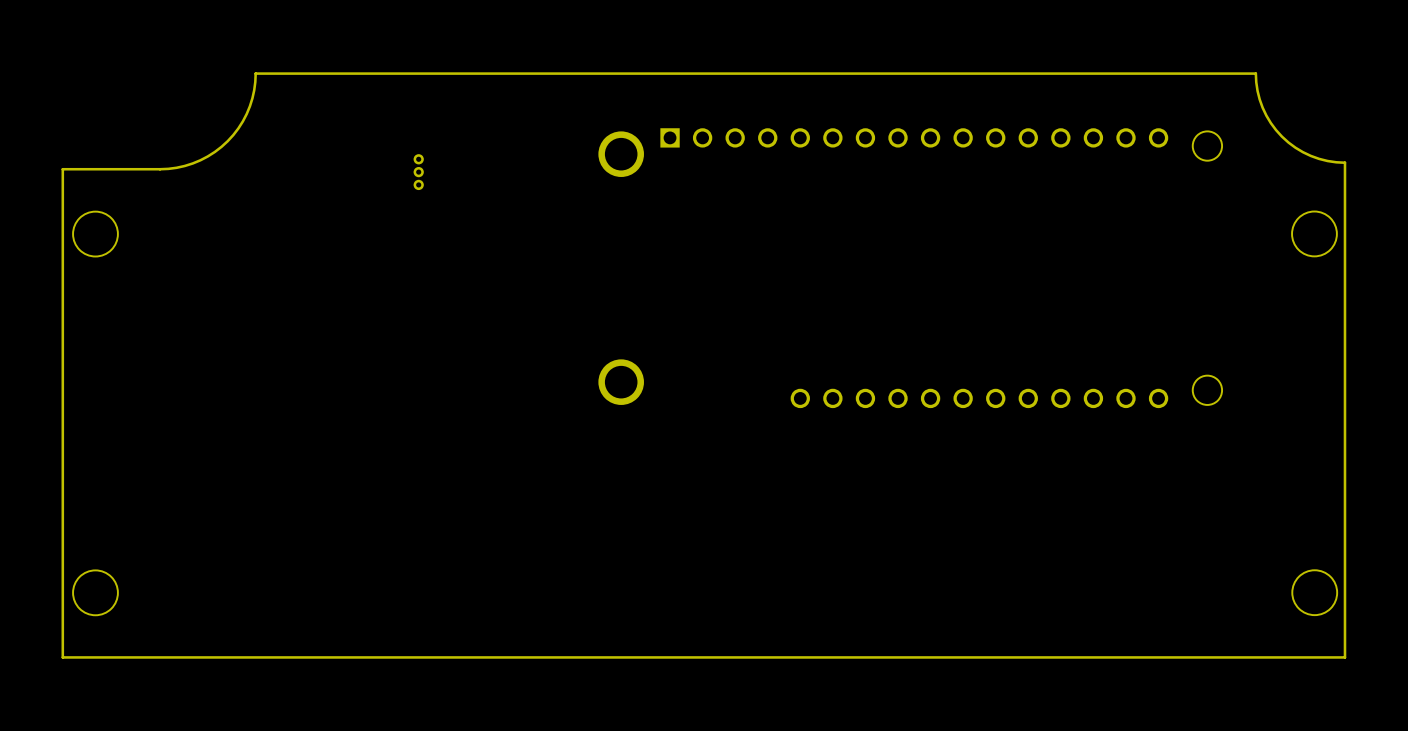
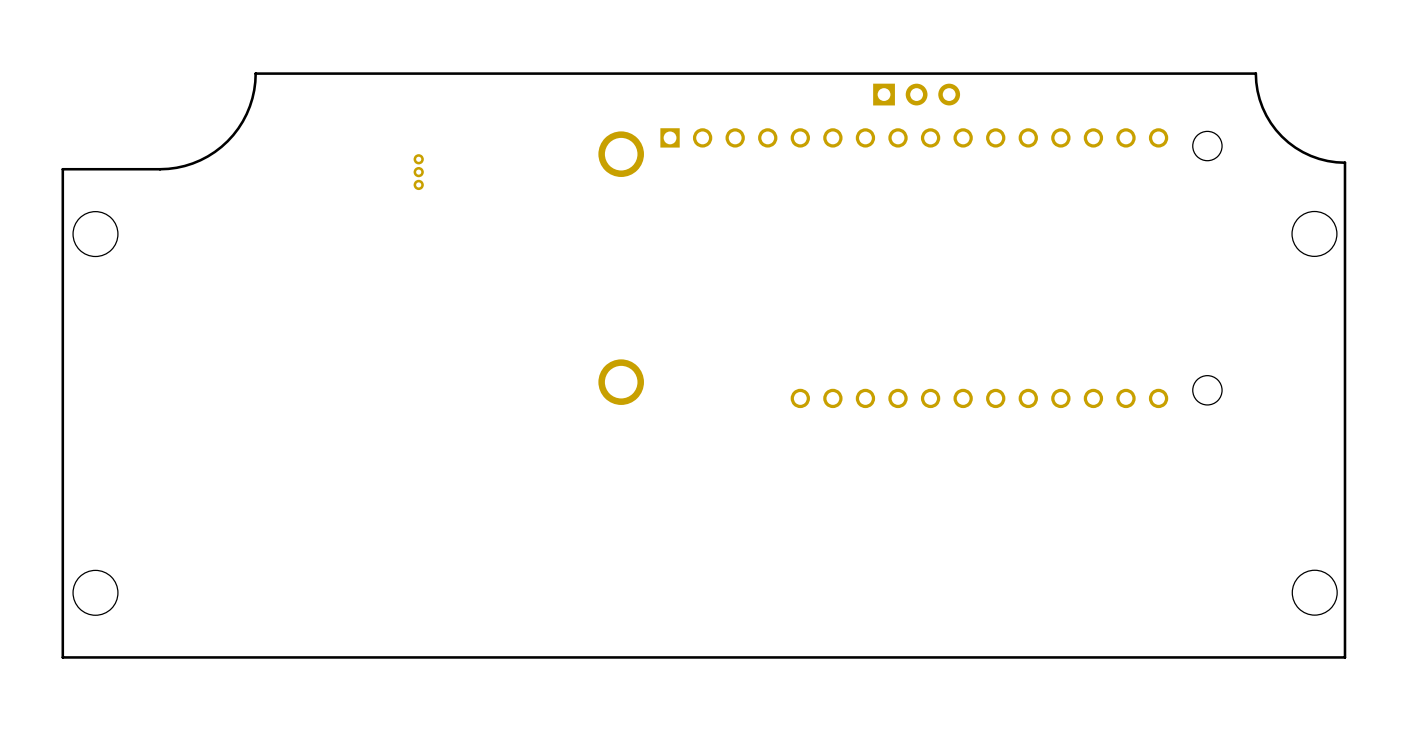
part: none -> (916, 94)

